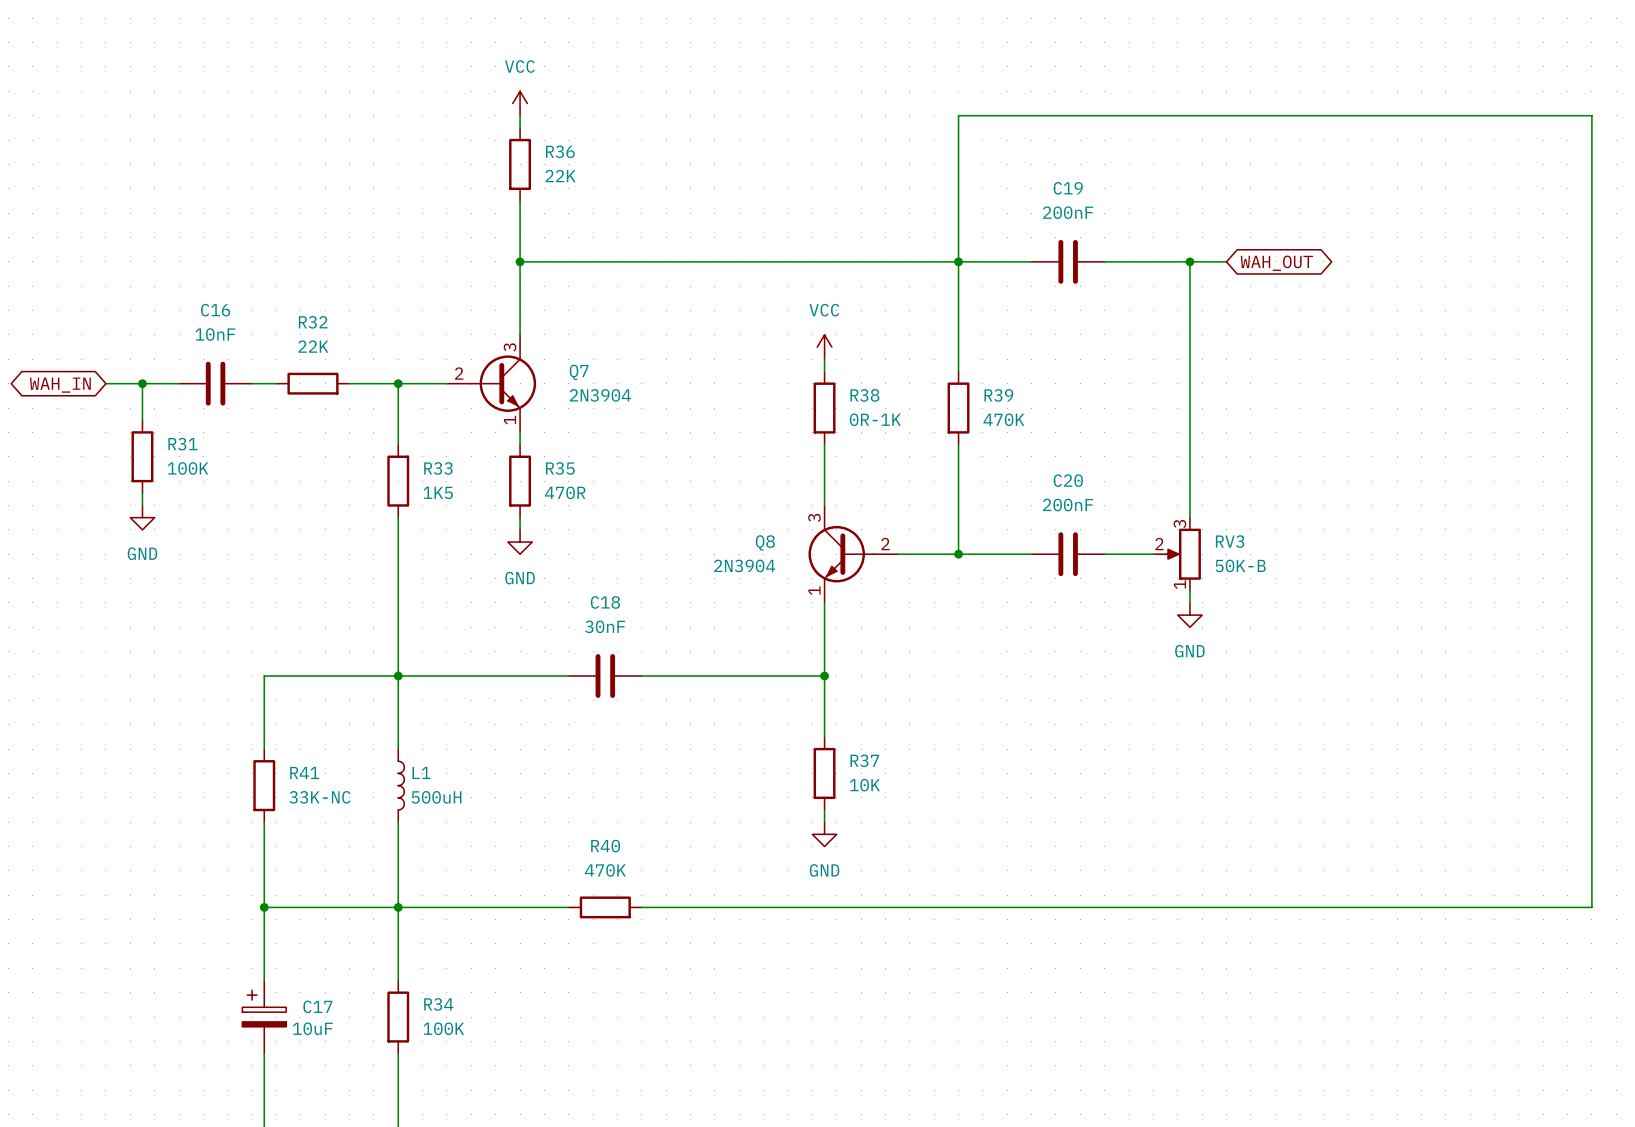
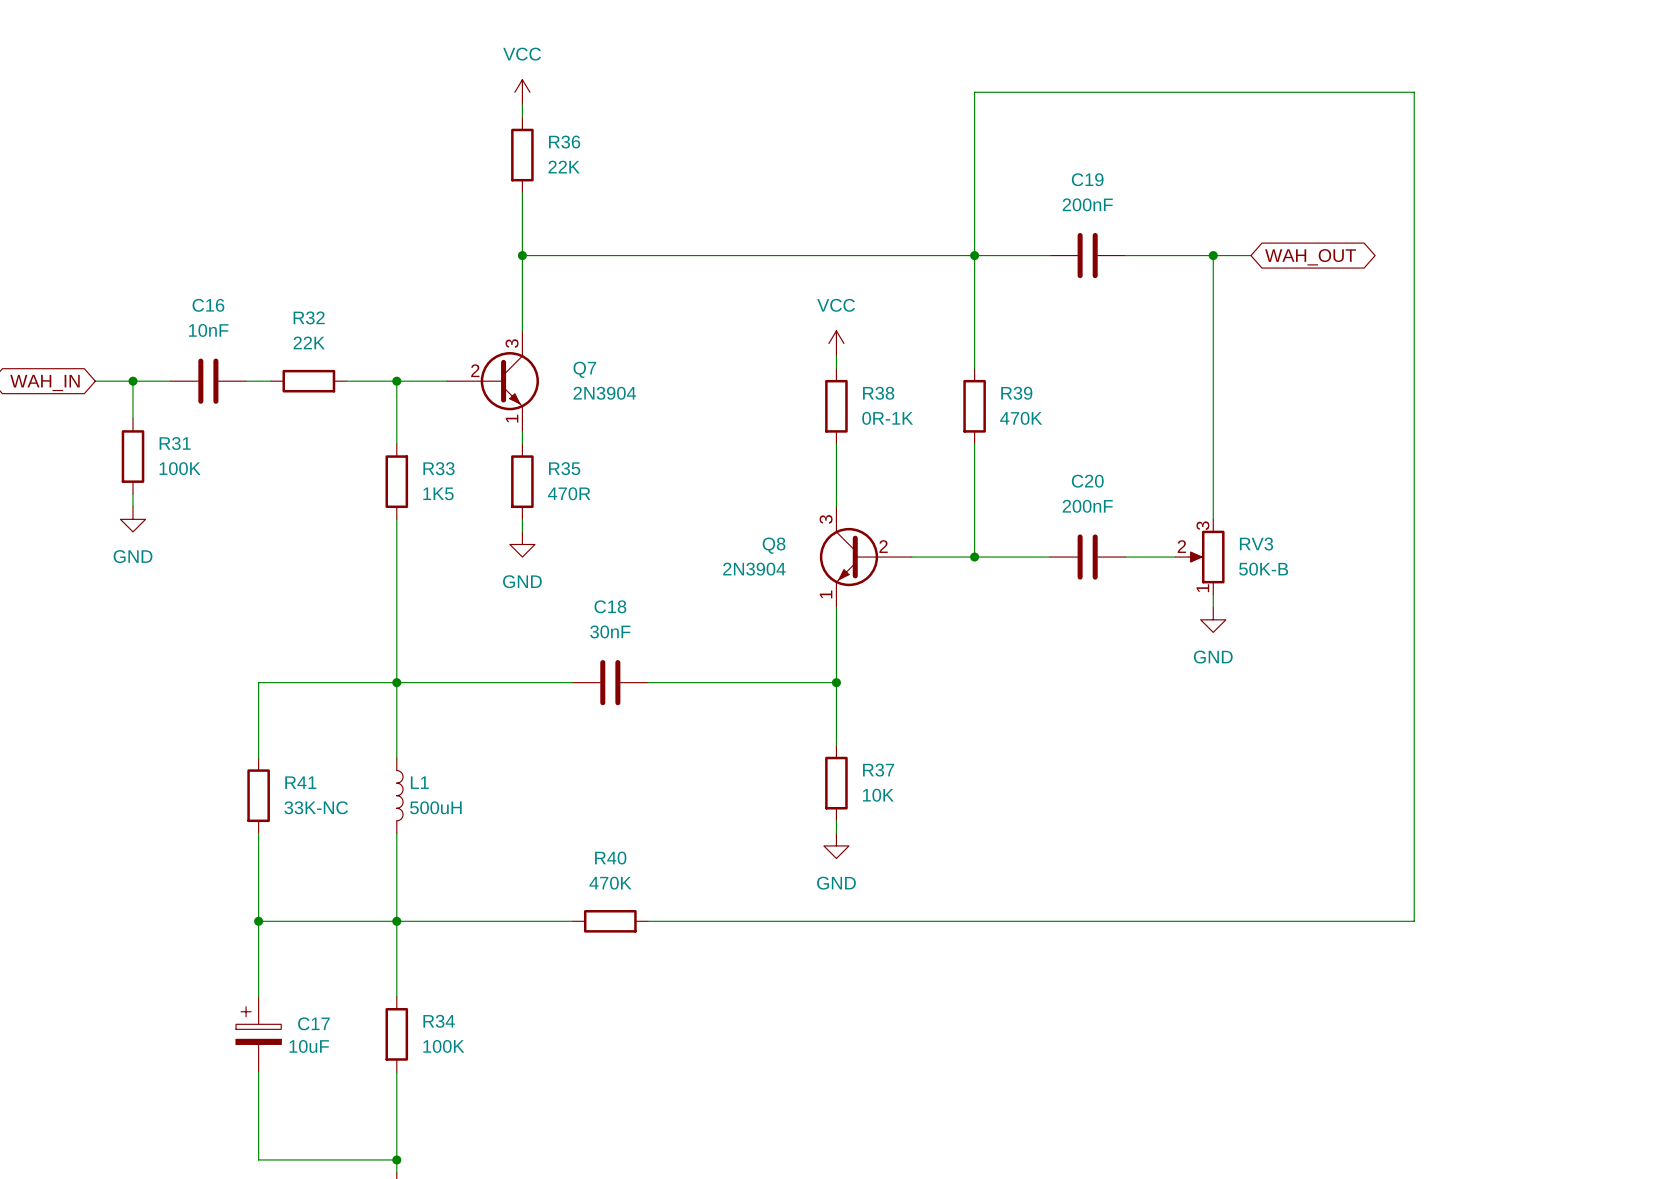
wire: (958, 115) (1591, 115) (1591, 907) (1384, 907) -> (974, 104) (974, 92) (1414, 92) (1414, 921)
Q7 symbol: [446, 334, 537, 433] -> [447, 330, 539, 432]
Q8 symbol: [808, 505, 898, 603] -> [819, 506, 912, 608]

